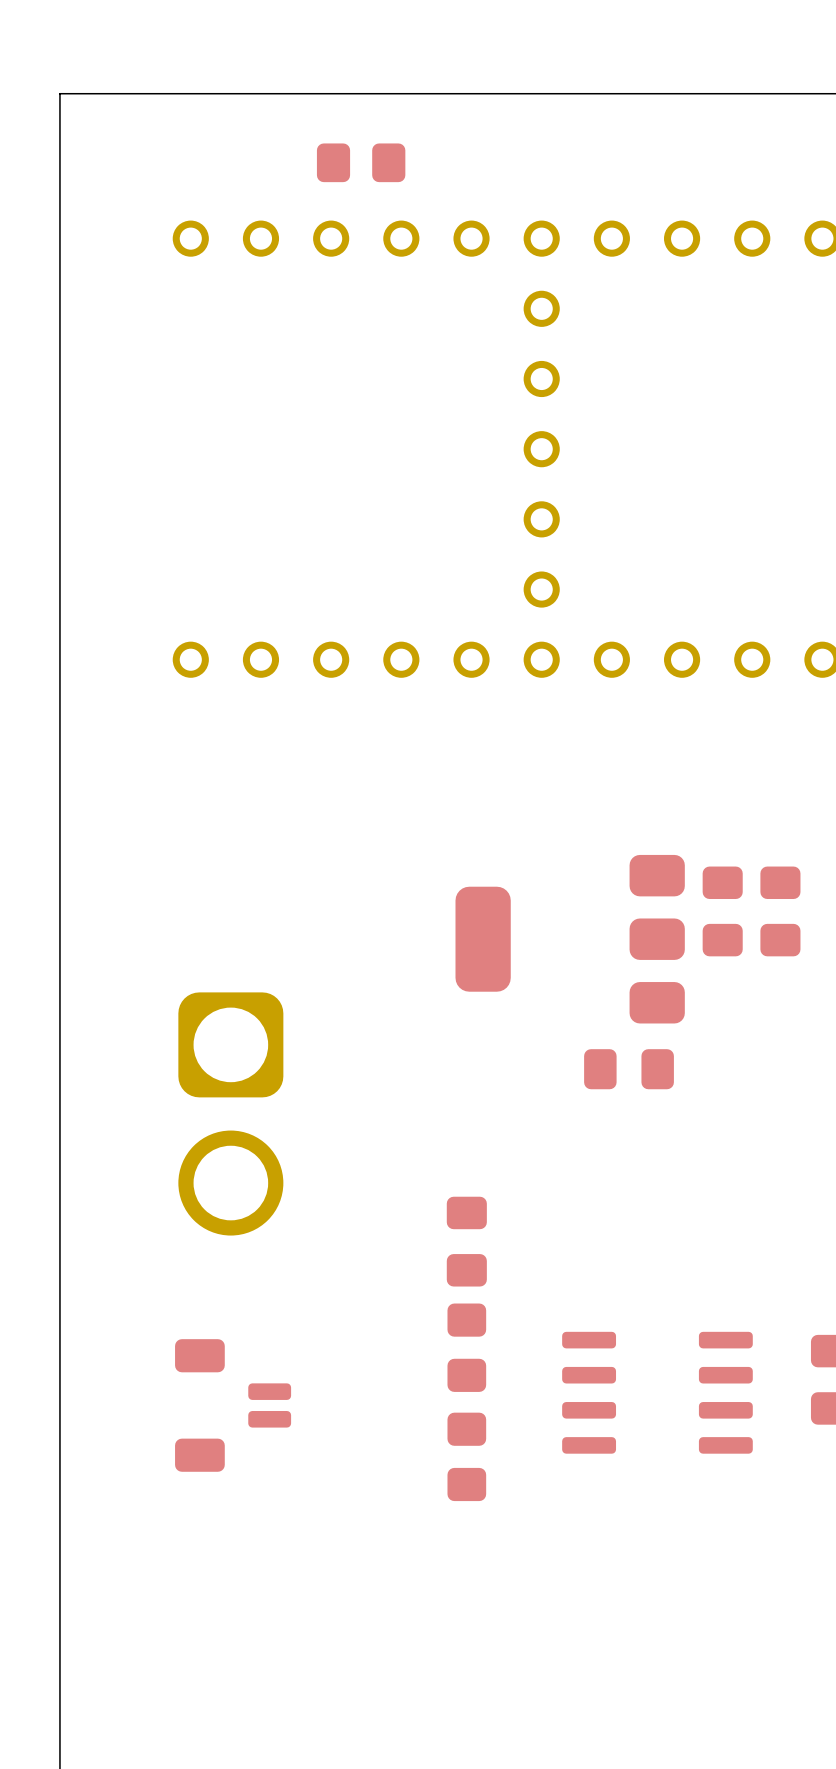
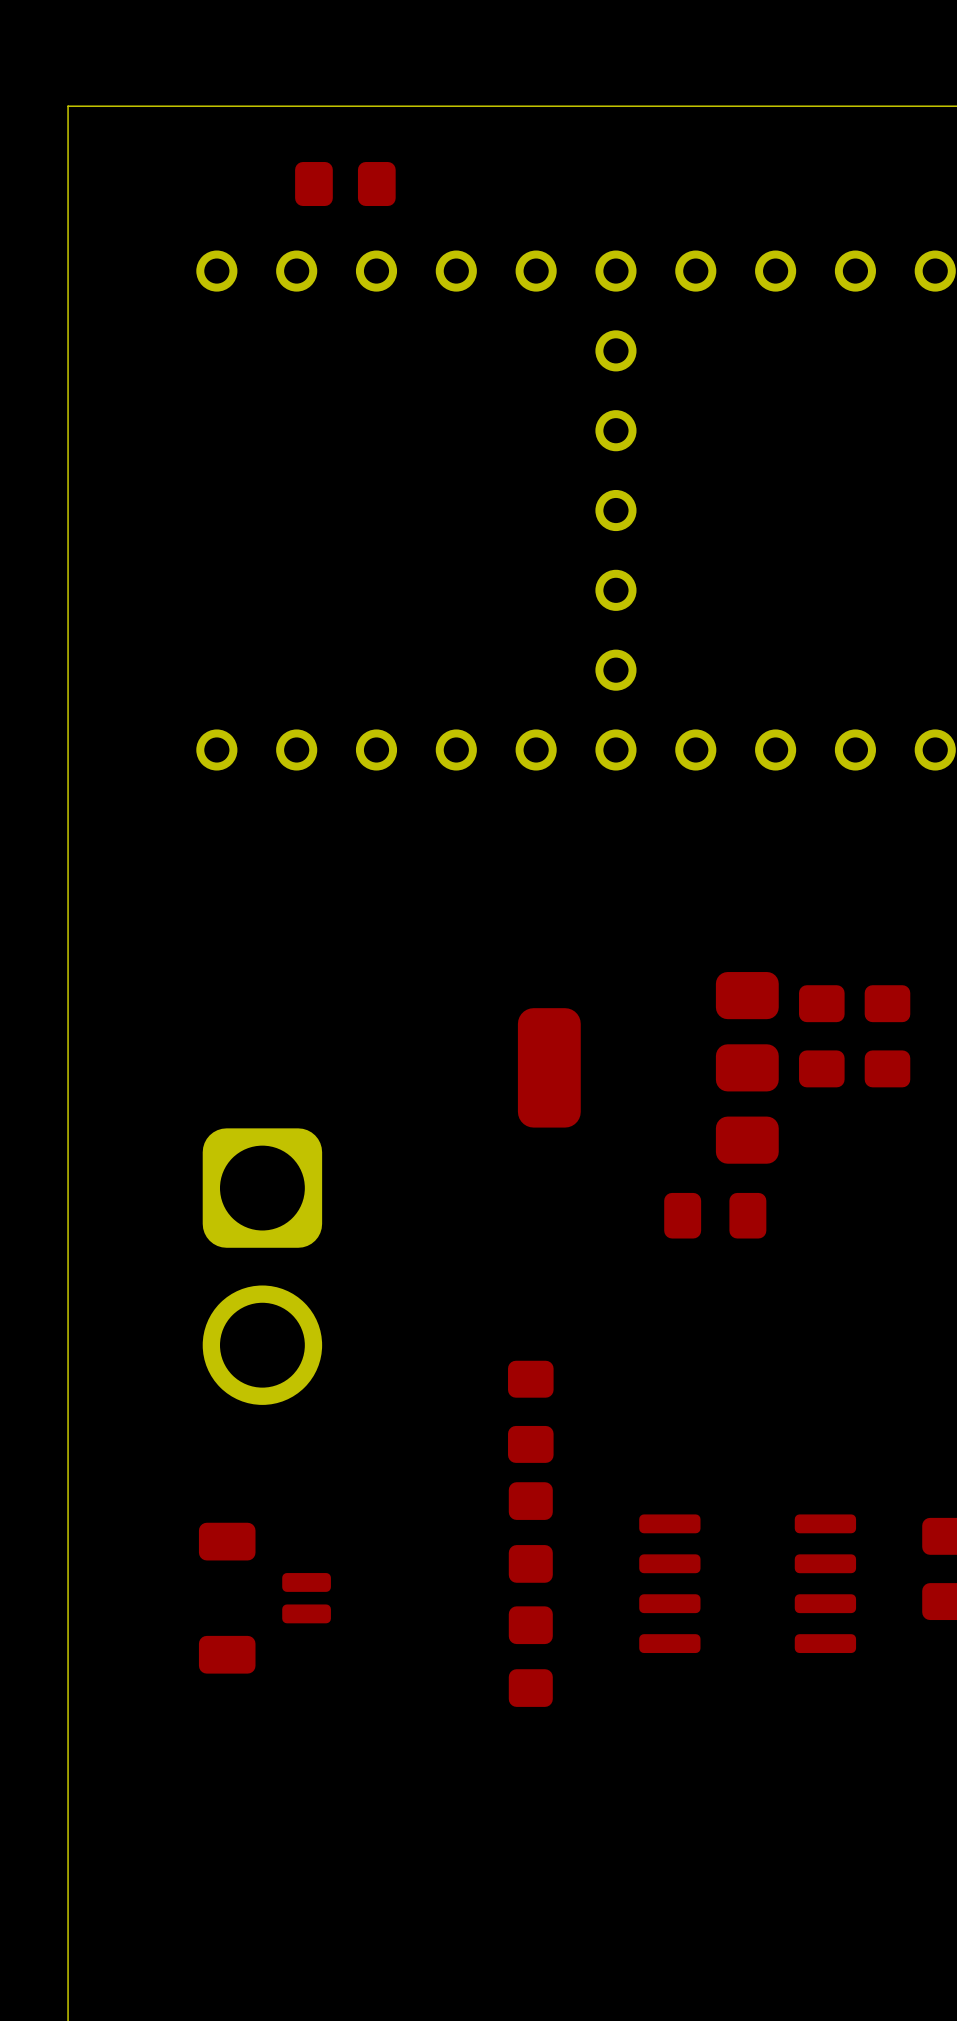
part position: (361, 162) -> (345, 184)

